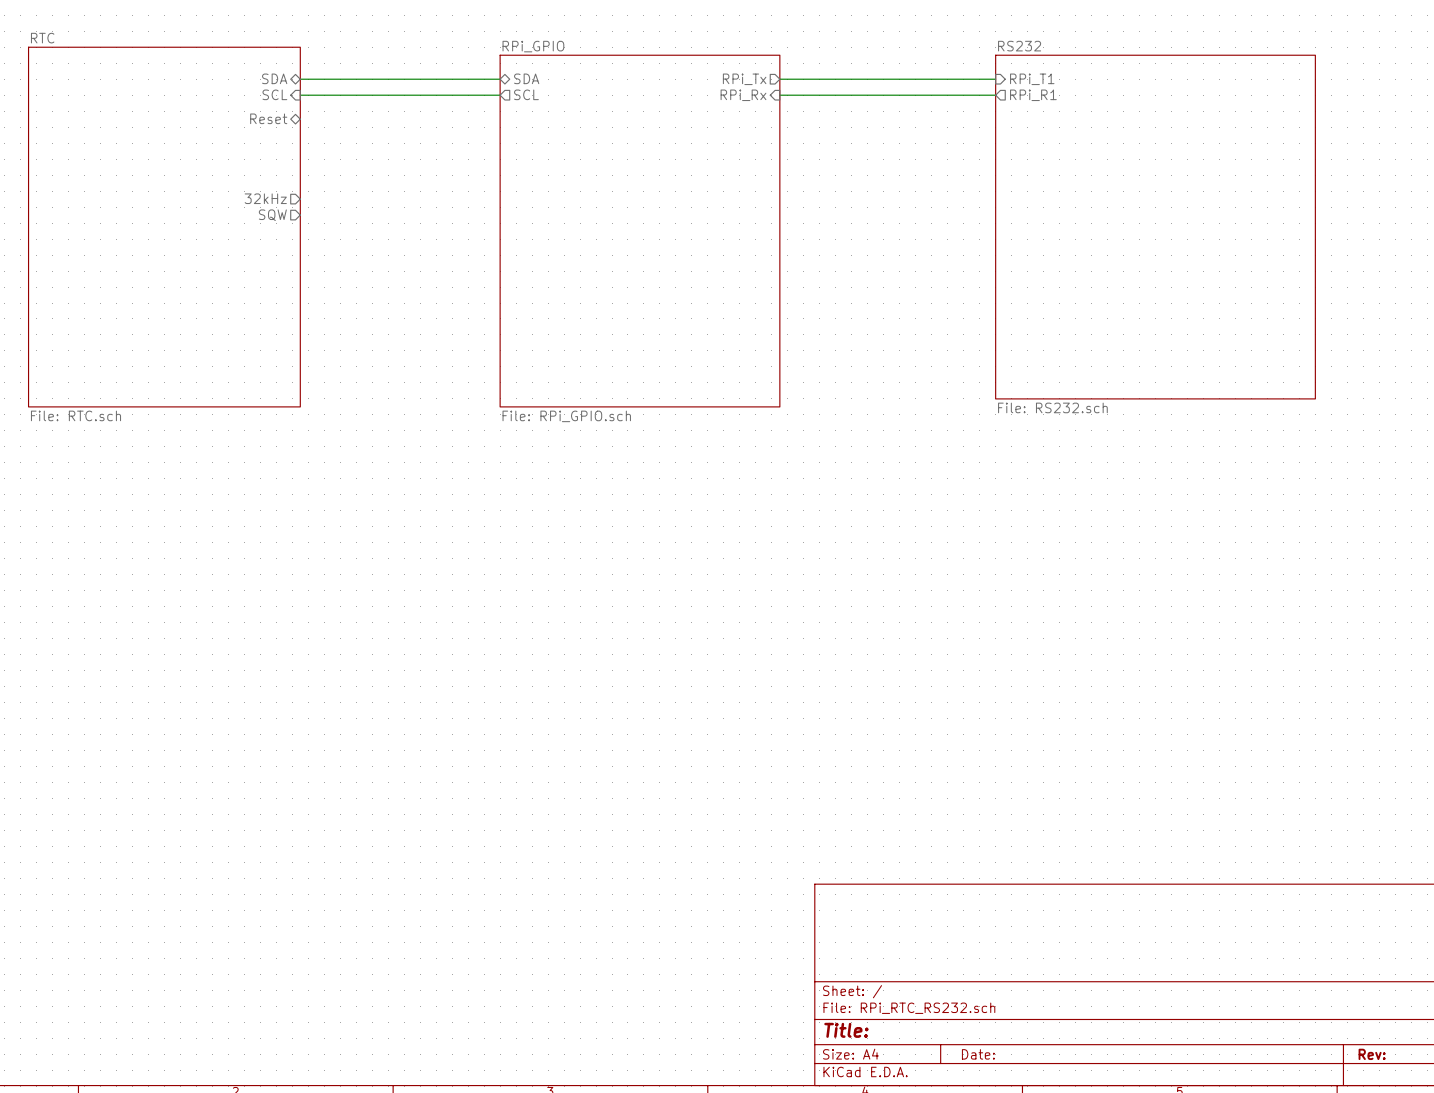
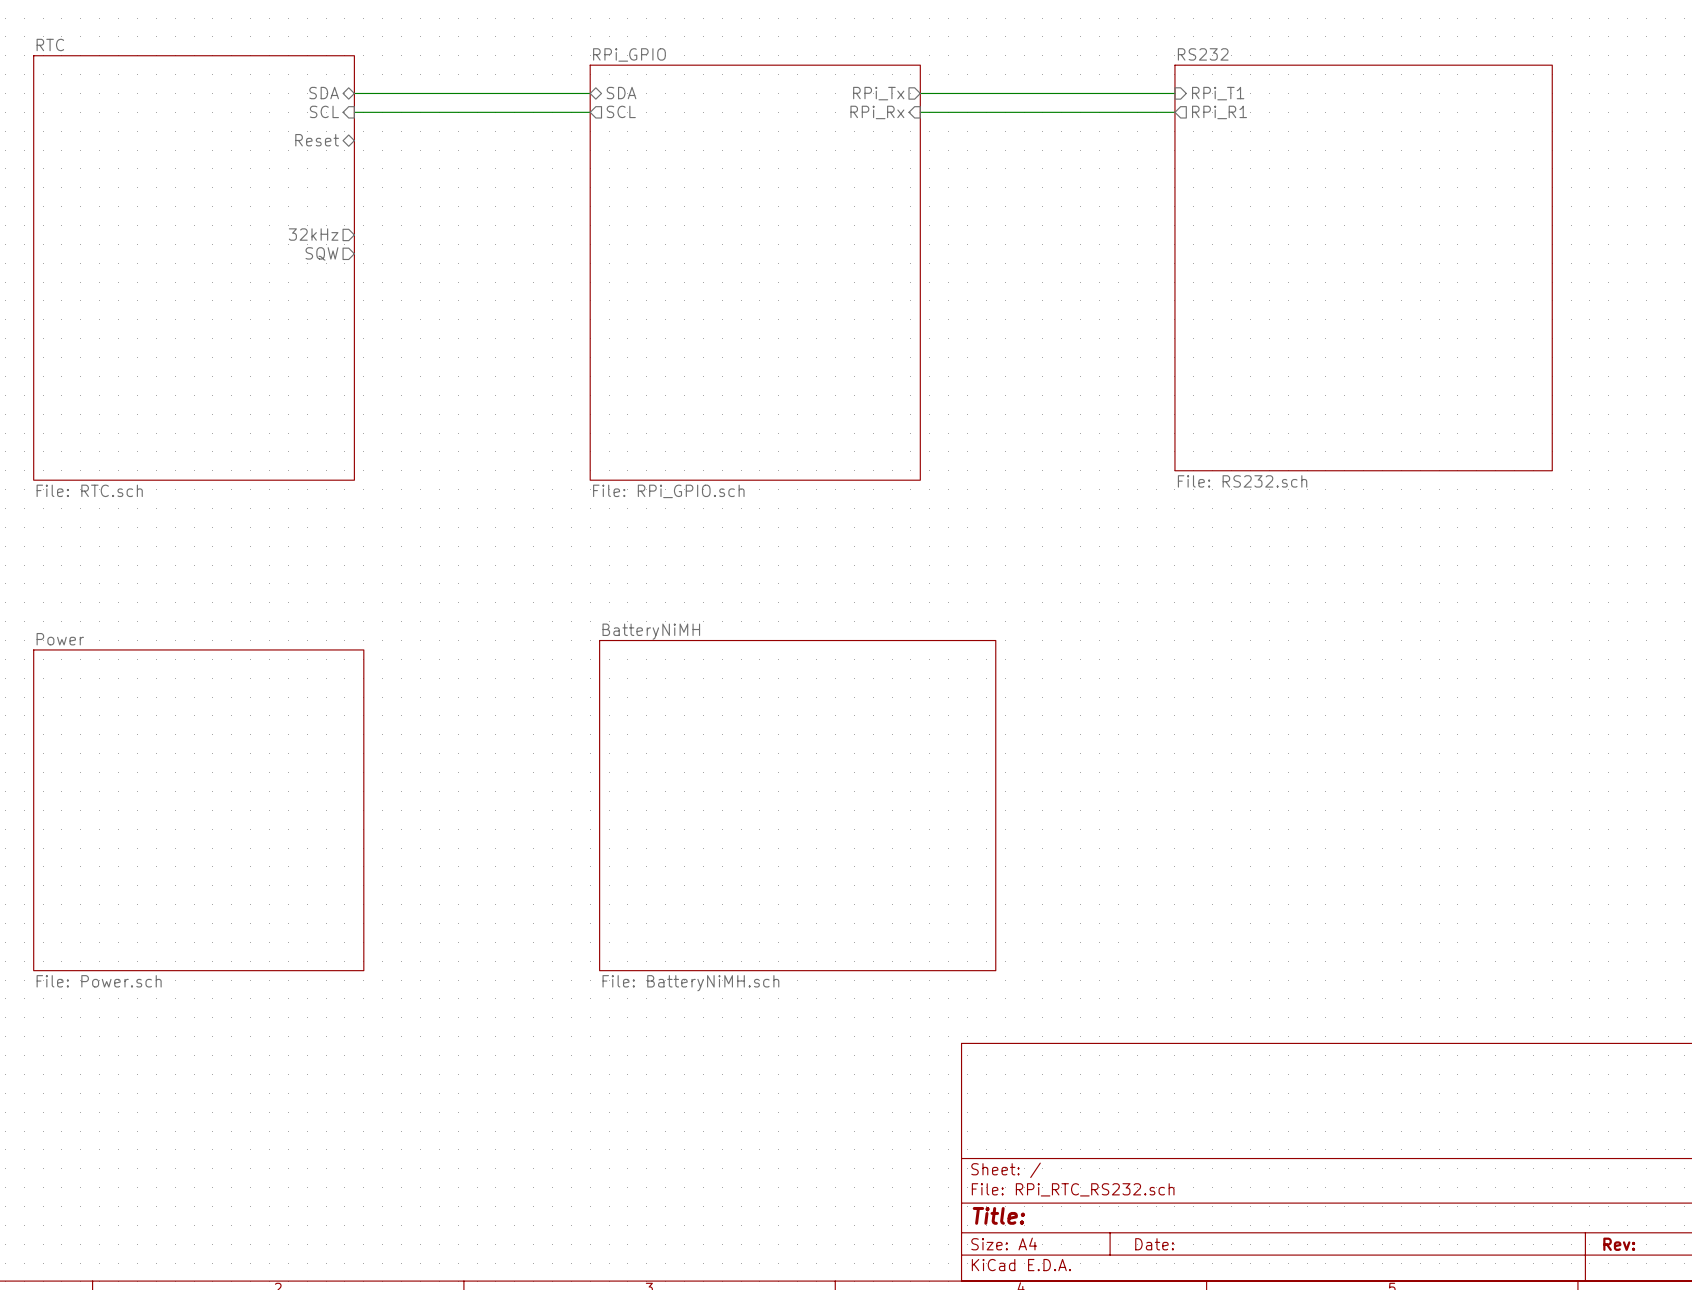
sheet BatteryNiMH: none -> File: BatteryNiMH.sch (797, 805)
sheet Power: none -> File: Power.sch (198, 810)

